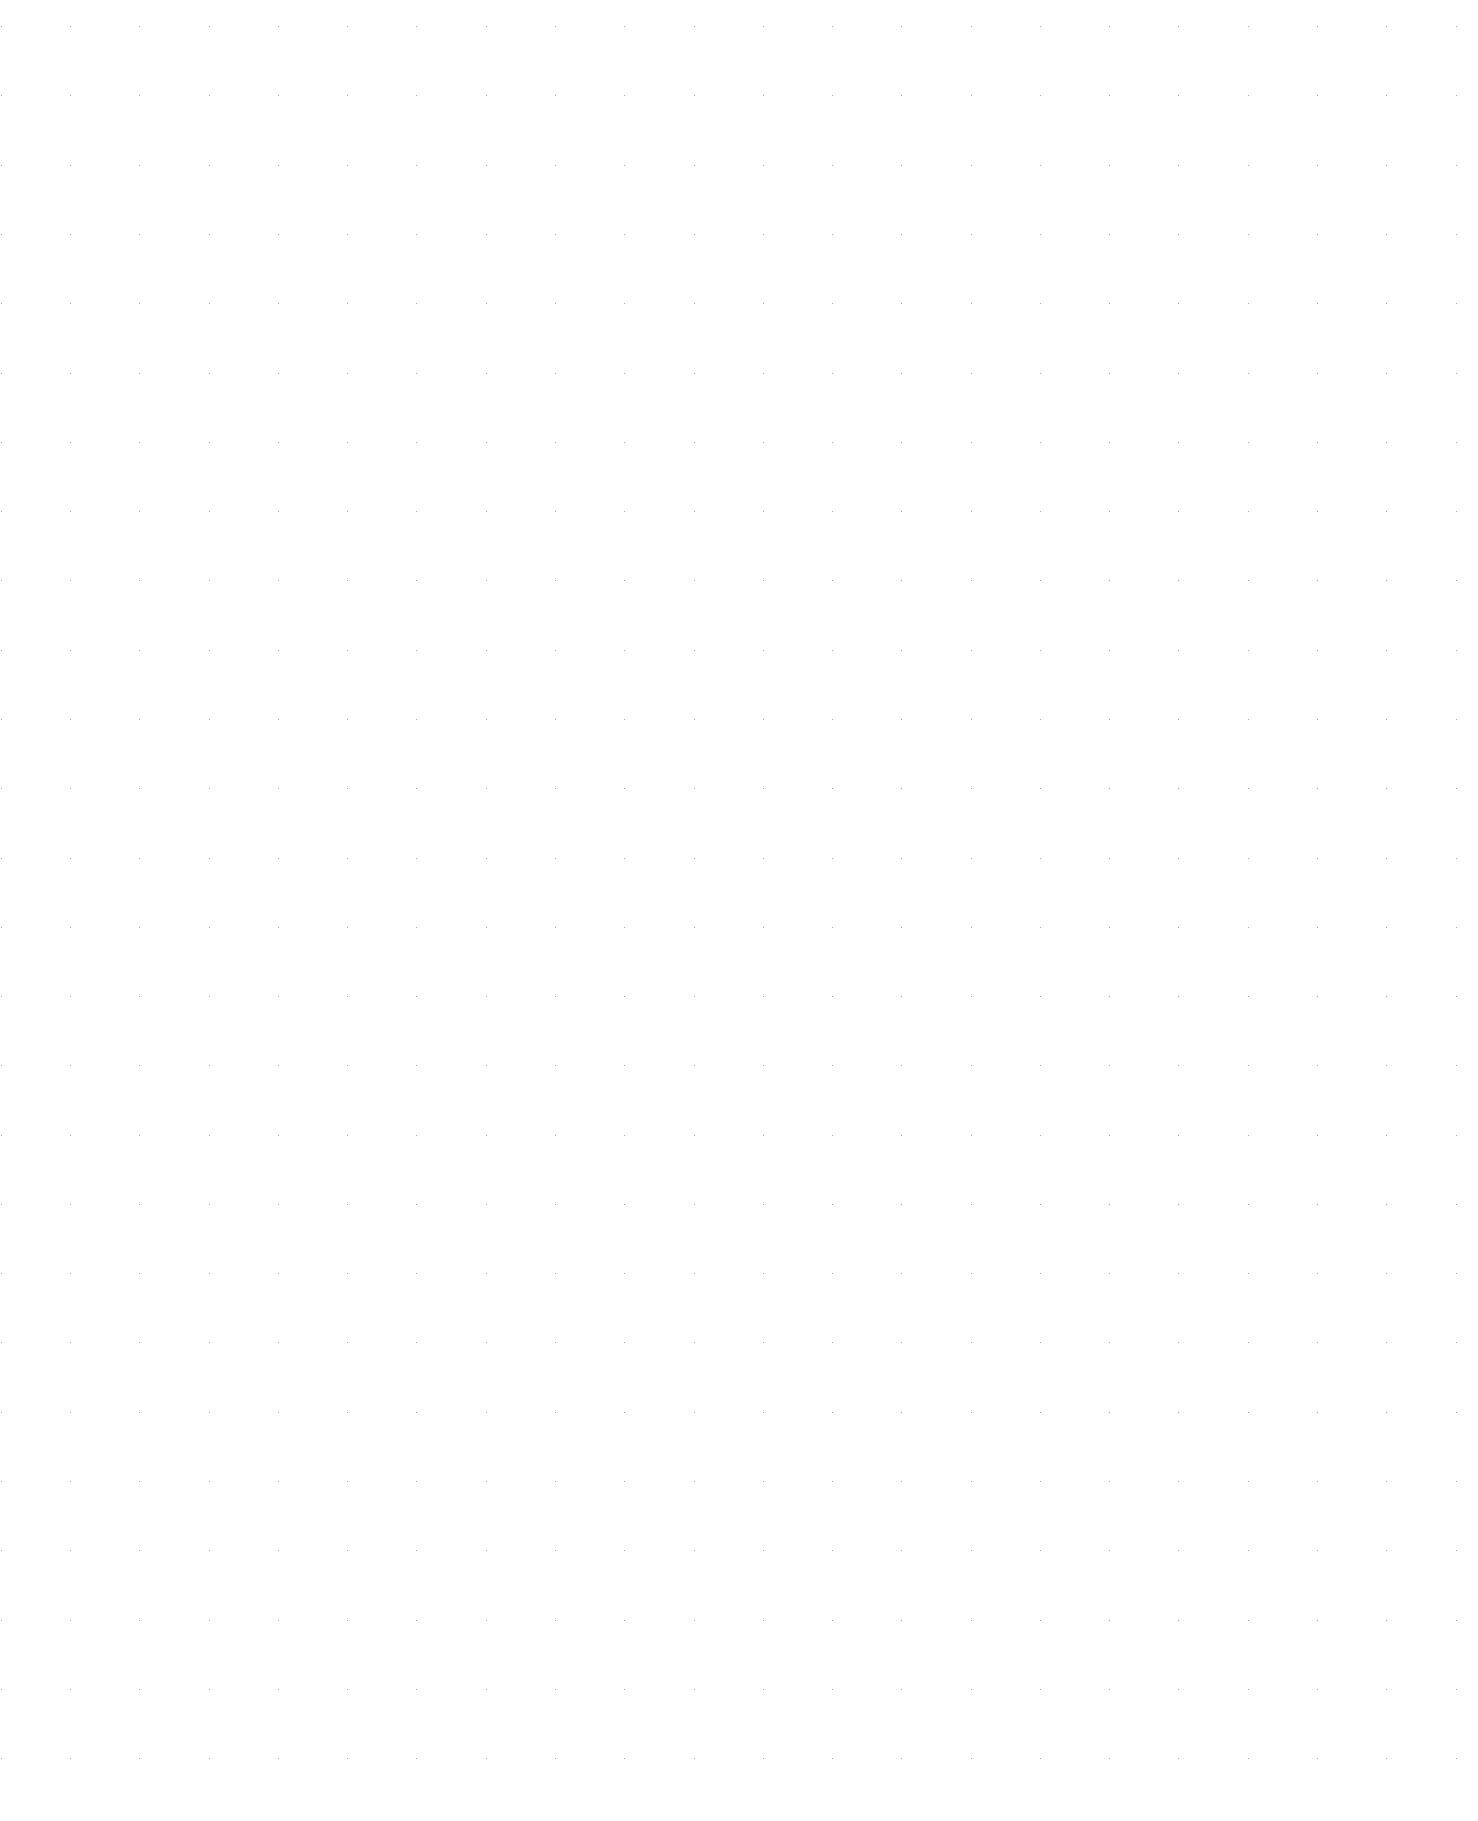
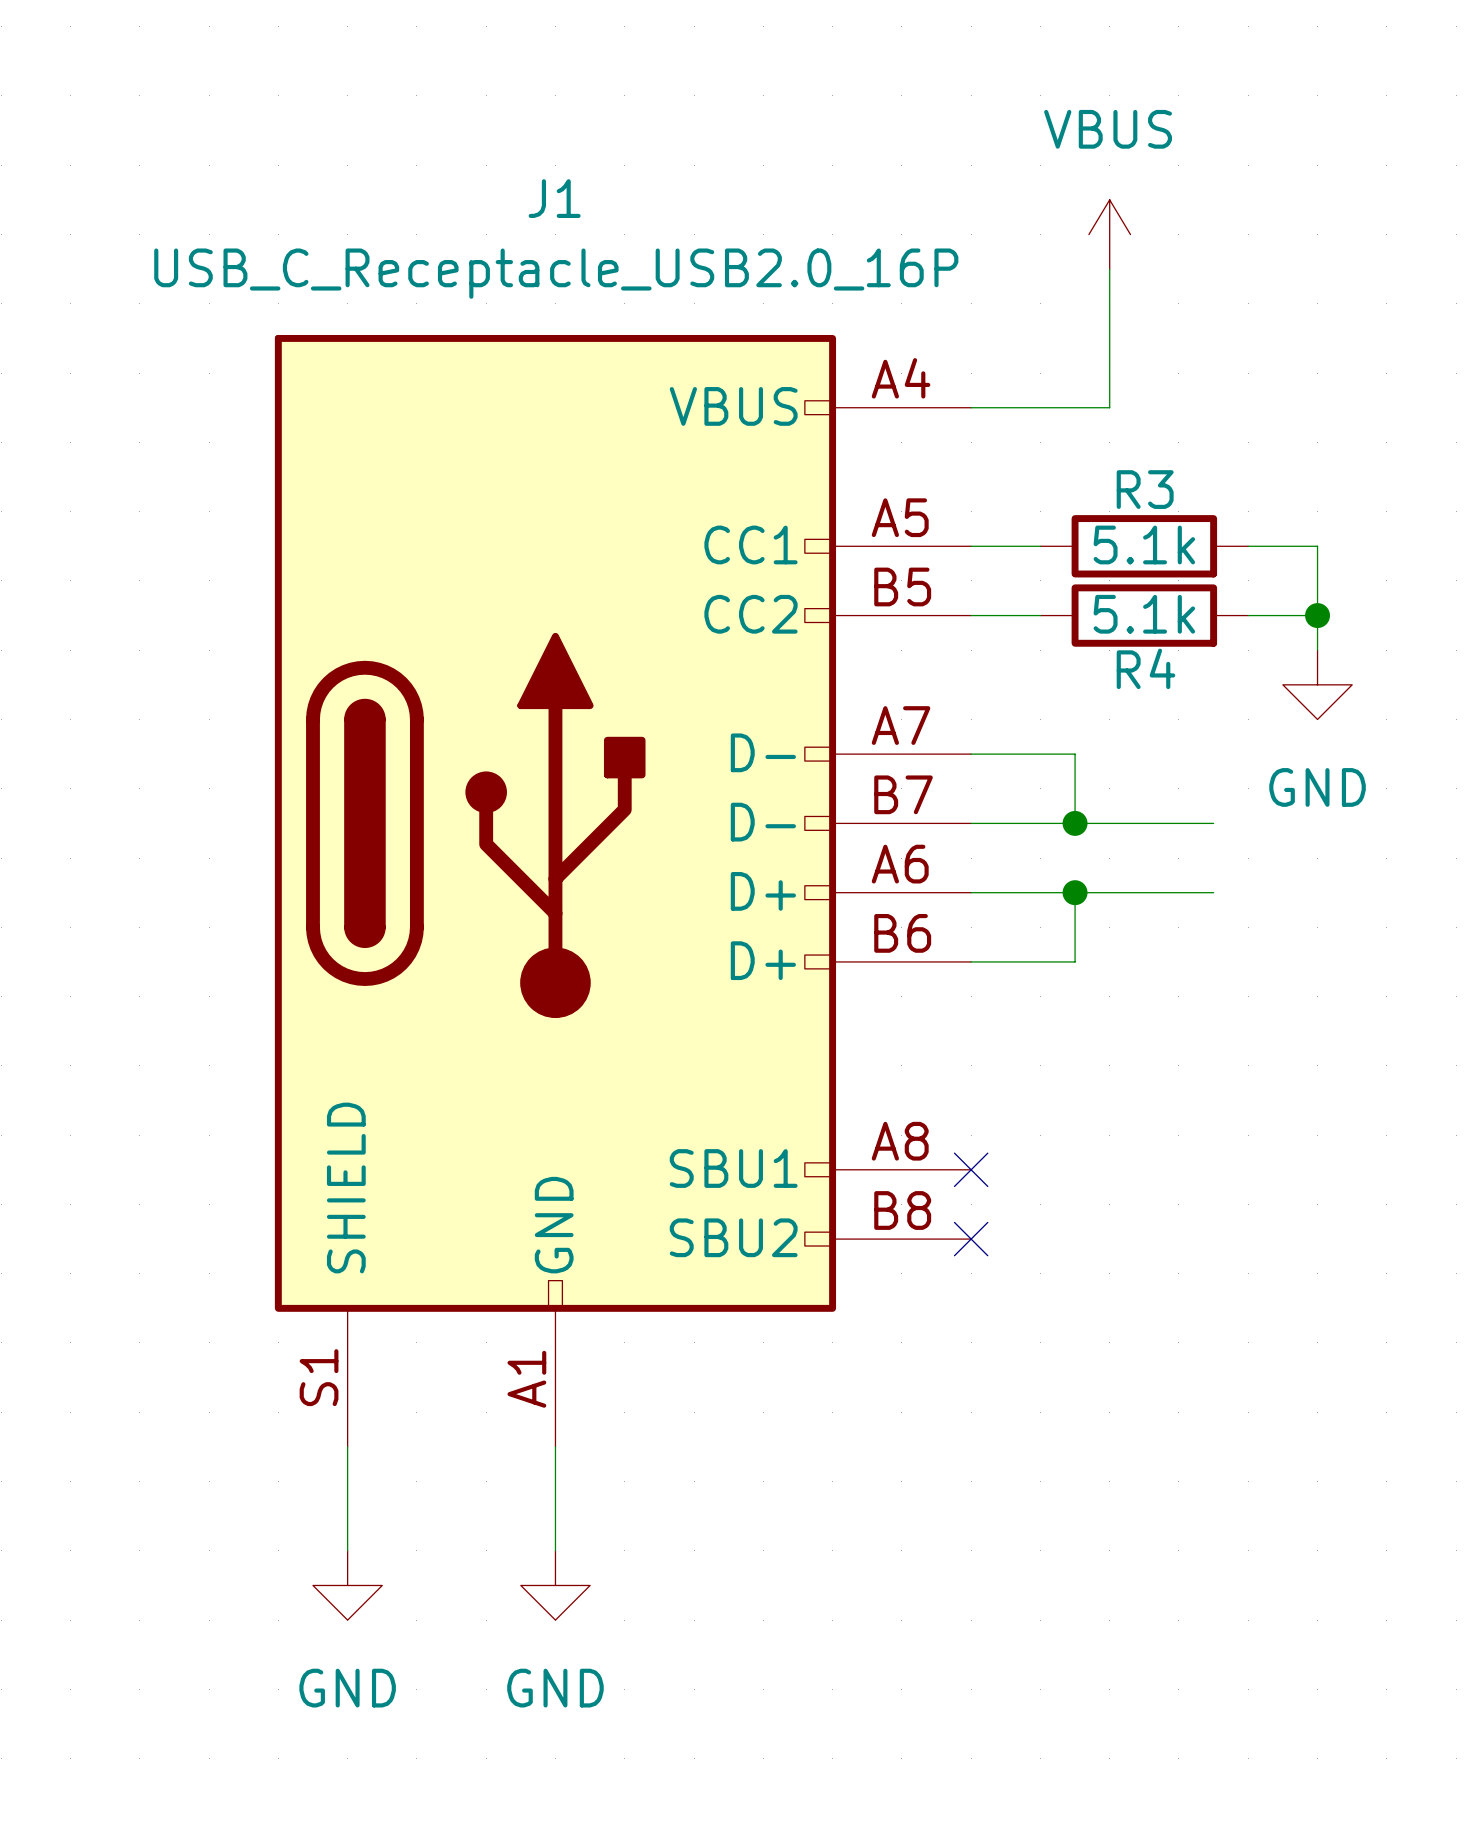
power symbol: none -> VBUS (1109, 234)
wire: none -> (1109, 269) (1109, 407) (971, 407)
wire: none -> (971, 546) (1040, 546)
R3: none -> 5.1k (1144, 546)
wire: none -> (1248, 546) (1317, 546) (1317, 650)
wire: none -> (971, 615) (1040, 615)
R4: none -> 5.1k (1144, 615)
wire: none -> (1248, 615) (1317, 615)
junction: none -> (1317, 615)
power symbol: none -> GND (1317, 684)
wire: none -> (971, 754) (1075, 754) (1075, 823)
wire: none -> (971, 823) (1213, 823)
junction: none -> (1075, 823)
J1: none -> USB_C_Receptacle_USB2.0_16P (623, 890)
wire: none -> (971, 892) (1213, 892)
wire: none -> (1075, 892) (1075, 961) (971, 961)
junction: none -> (1075, 892)
no-connect mark: none -> (971, 1169)
no-connect mark: none -> (971, 1239)
wire: none -> (347, 1446) (347, 1550)
wire: none -> (555, 1446) (555, 1550)
power symbol: none -> GND (347, 1585)
power symbol: none -> GND (555, 1585)

